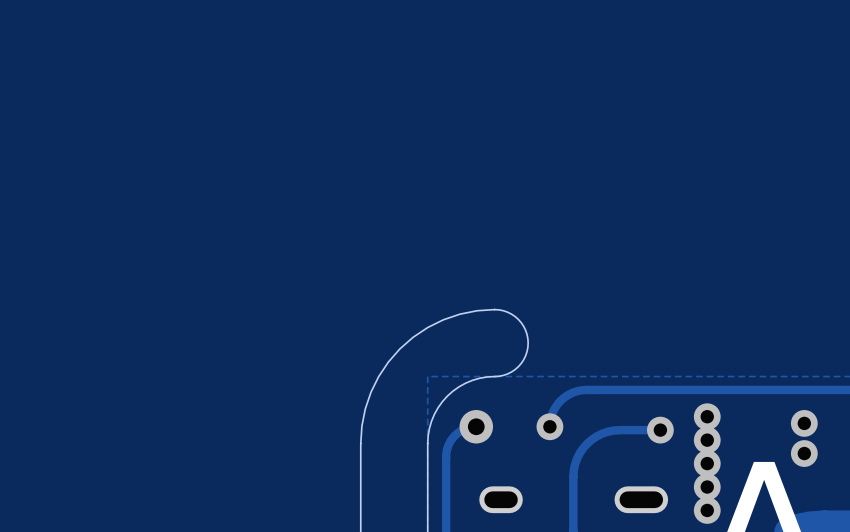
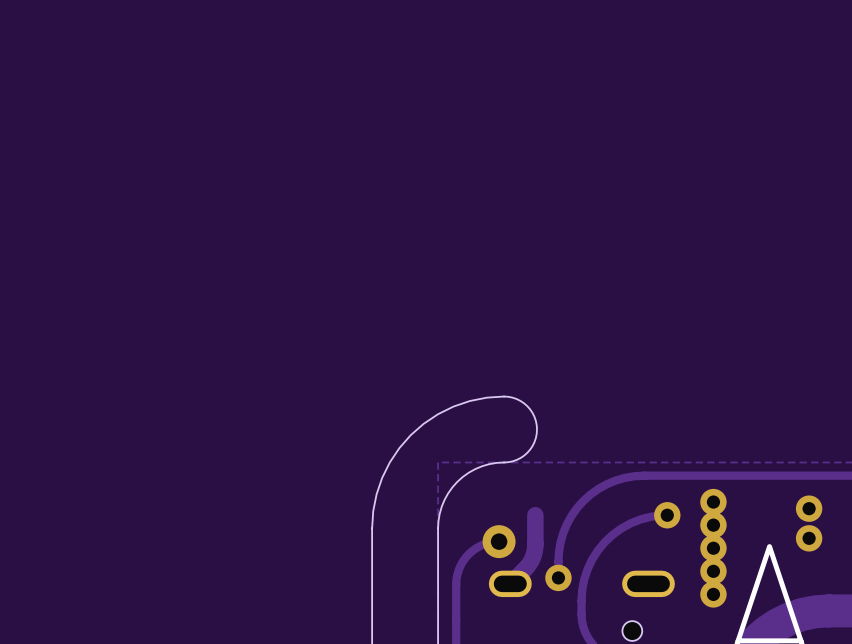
track: (636, 389) (586, 389) (572, 392) (557, 404) (552, 412) (549, 426) -> (644, 475) (625, 477) (606, 484) (590, 494) (577, 507) (566, 524) (560, 542) (558, 577)
track: (476, 426) (464, 429) (457, 432) (448, 445) (446, 456) (446, 500) -> (499, 541) (480, 545) (468, 554) (458, 570) (456, 584)
via position: (476, 426) -> (499, 541)
via position: (549, 426) -> (558, 577)
track: none -> (535, 515) (535, 548) (532, 557) (527, 566) (510, 583)
track: (660, 430) (614, 430) (602, 433) (587, 443) (576, 459) (573, 470) (573, 517) -> (667, 515) (651, 516) (630, 523) (604, 542) (587, 569) (581, 601)

